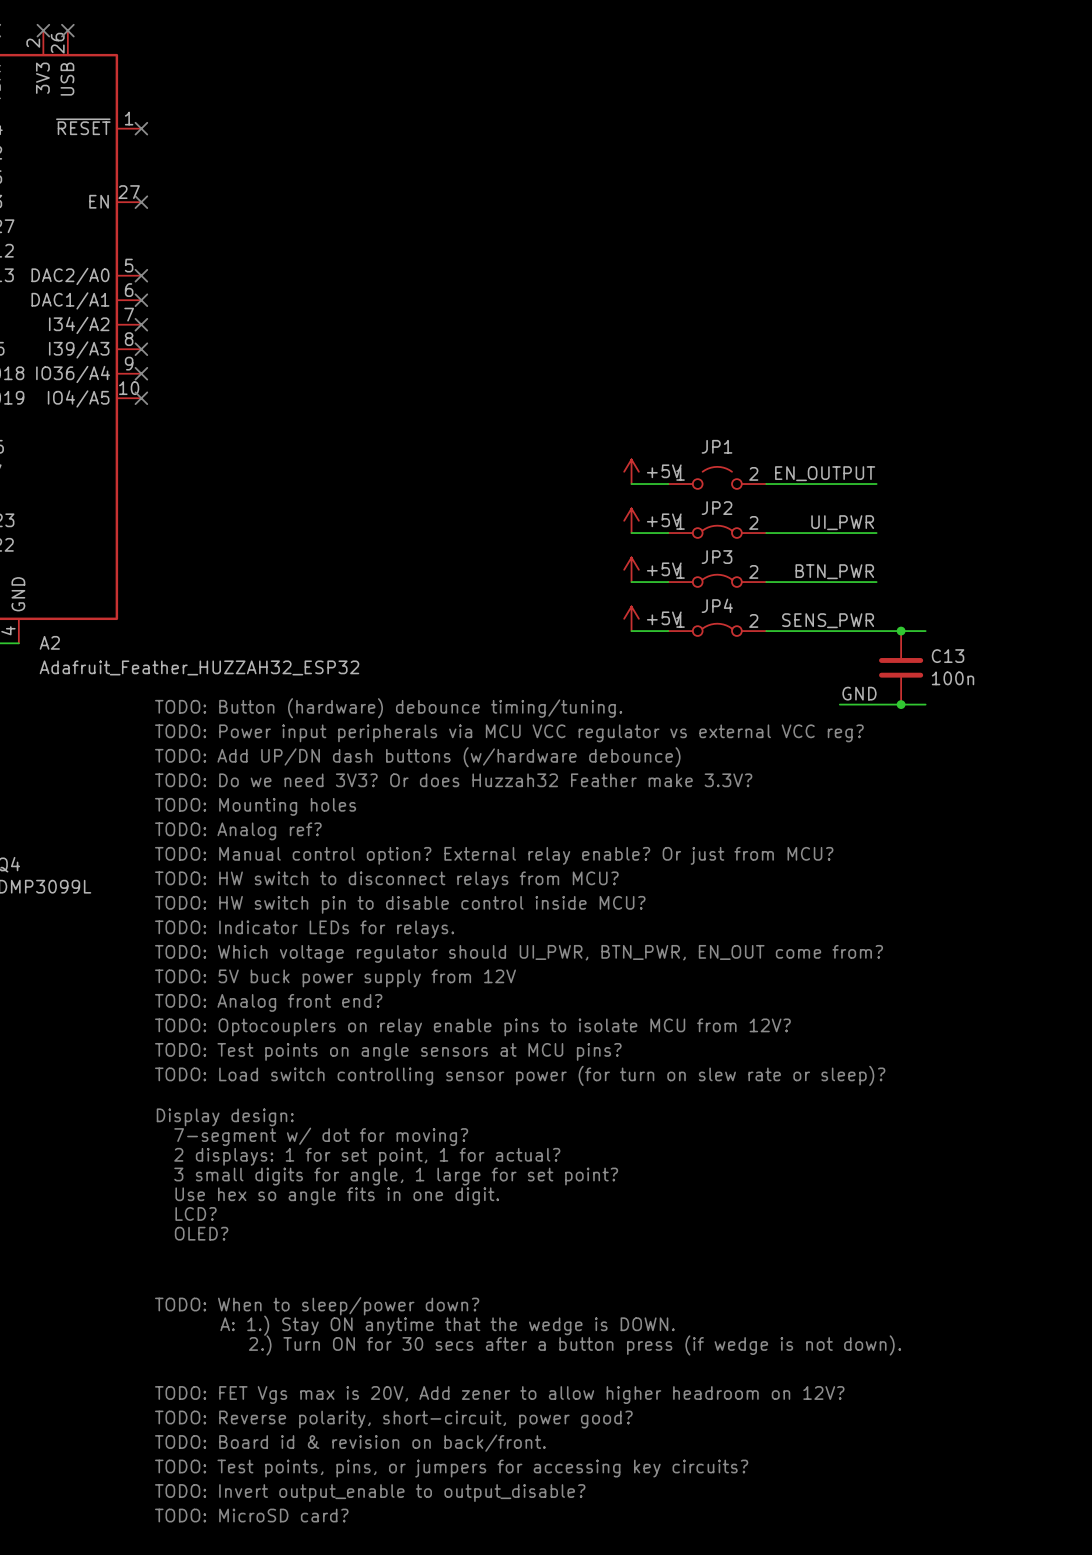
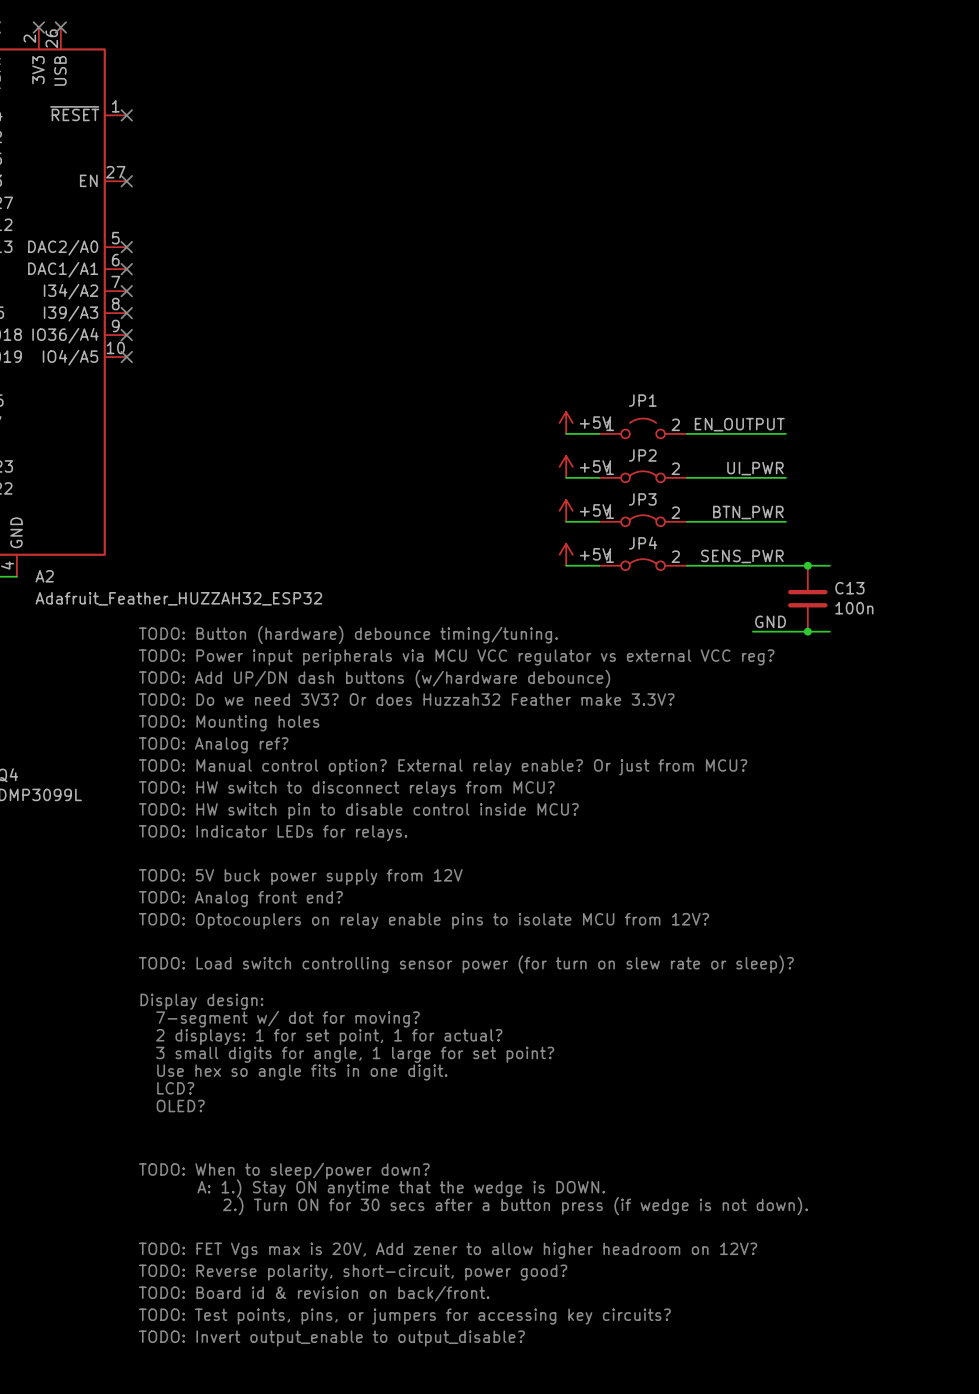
text: TODO: Which voltage regulator should UI_PWR, BTN_PWR, EN_OUT come from? (519, 953) -> none
text: TODO: Test points on angle sensors at MCU pins? (388, 1051) -> none
text: TODO: MicroSD card? (251, 1515) -> none

